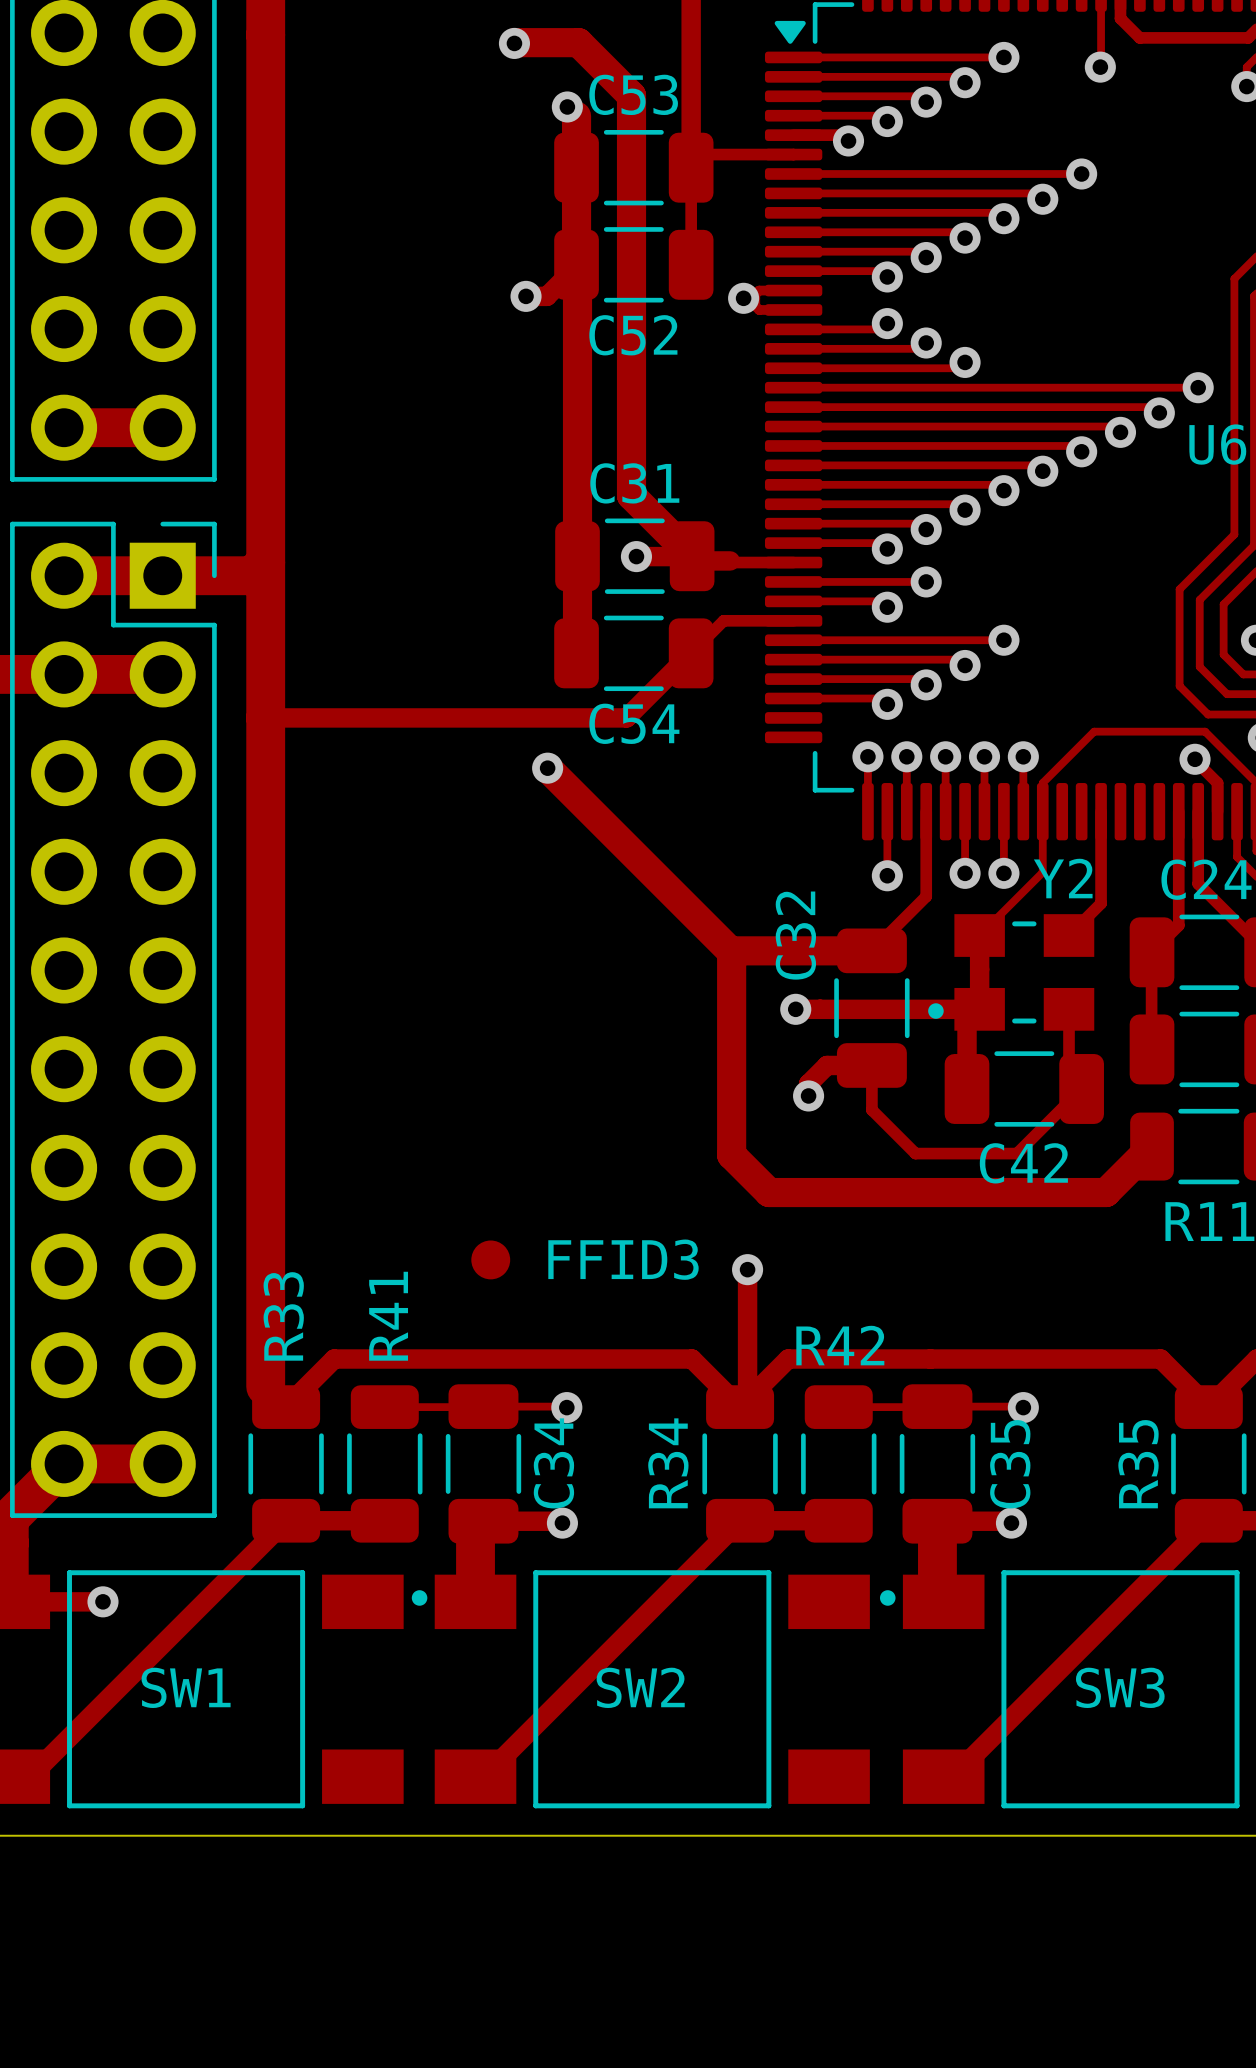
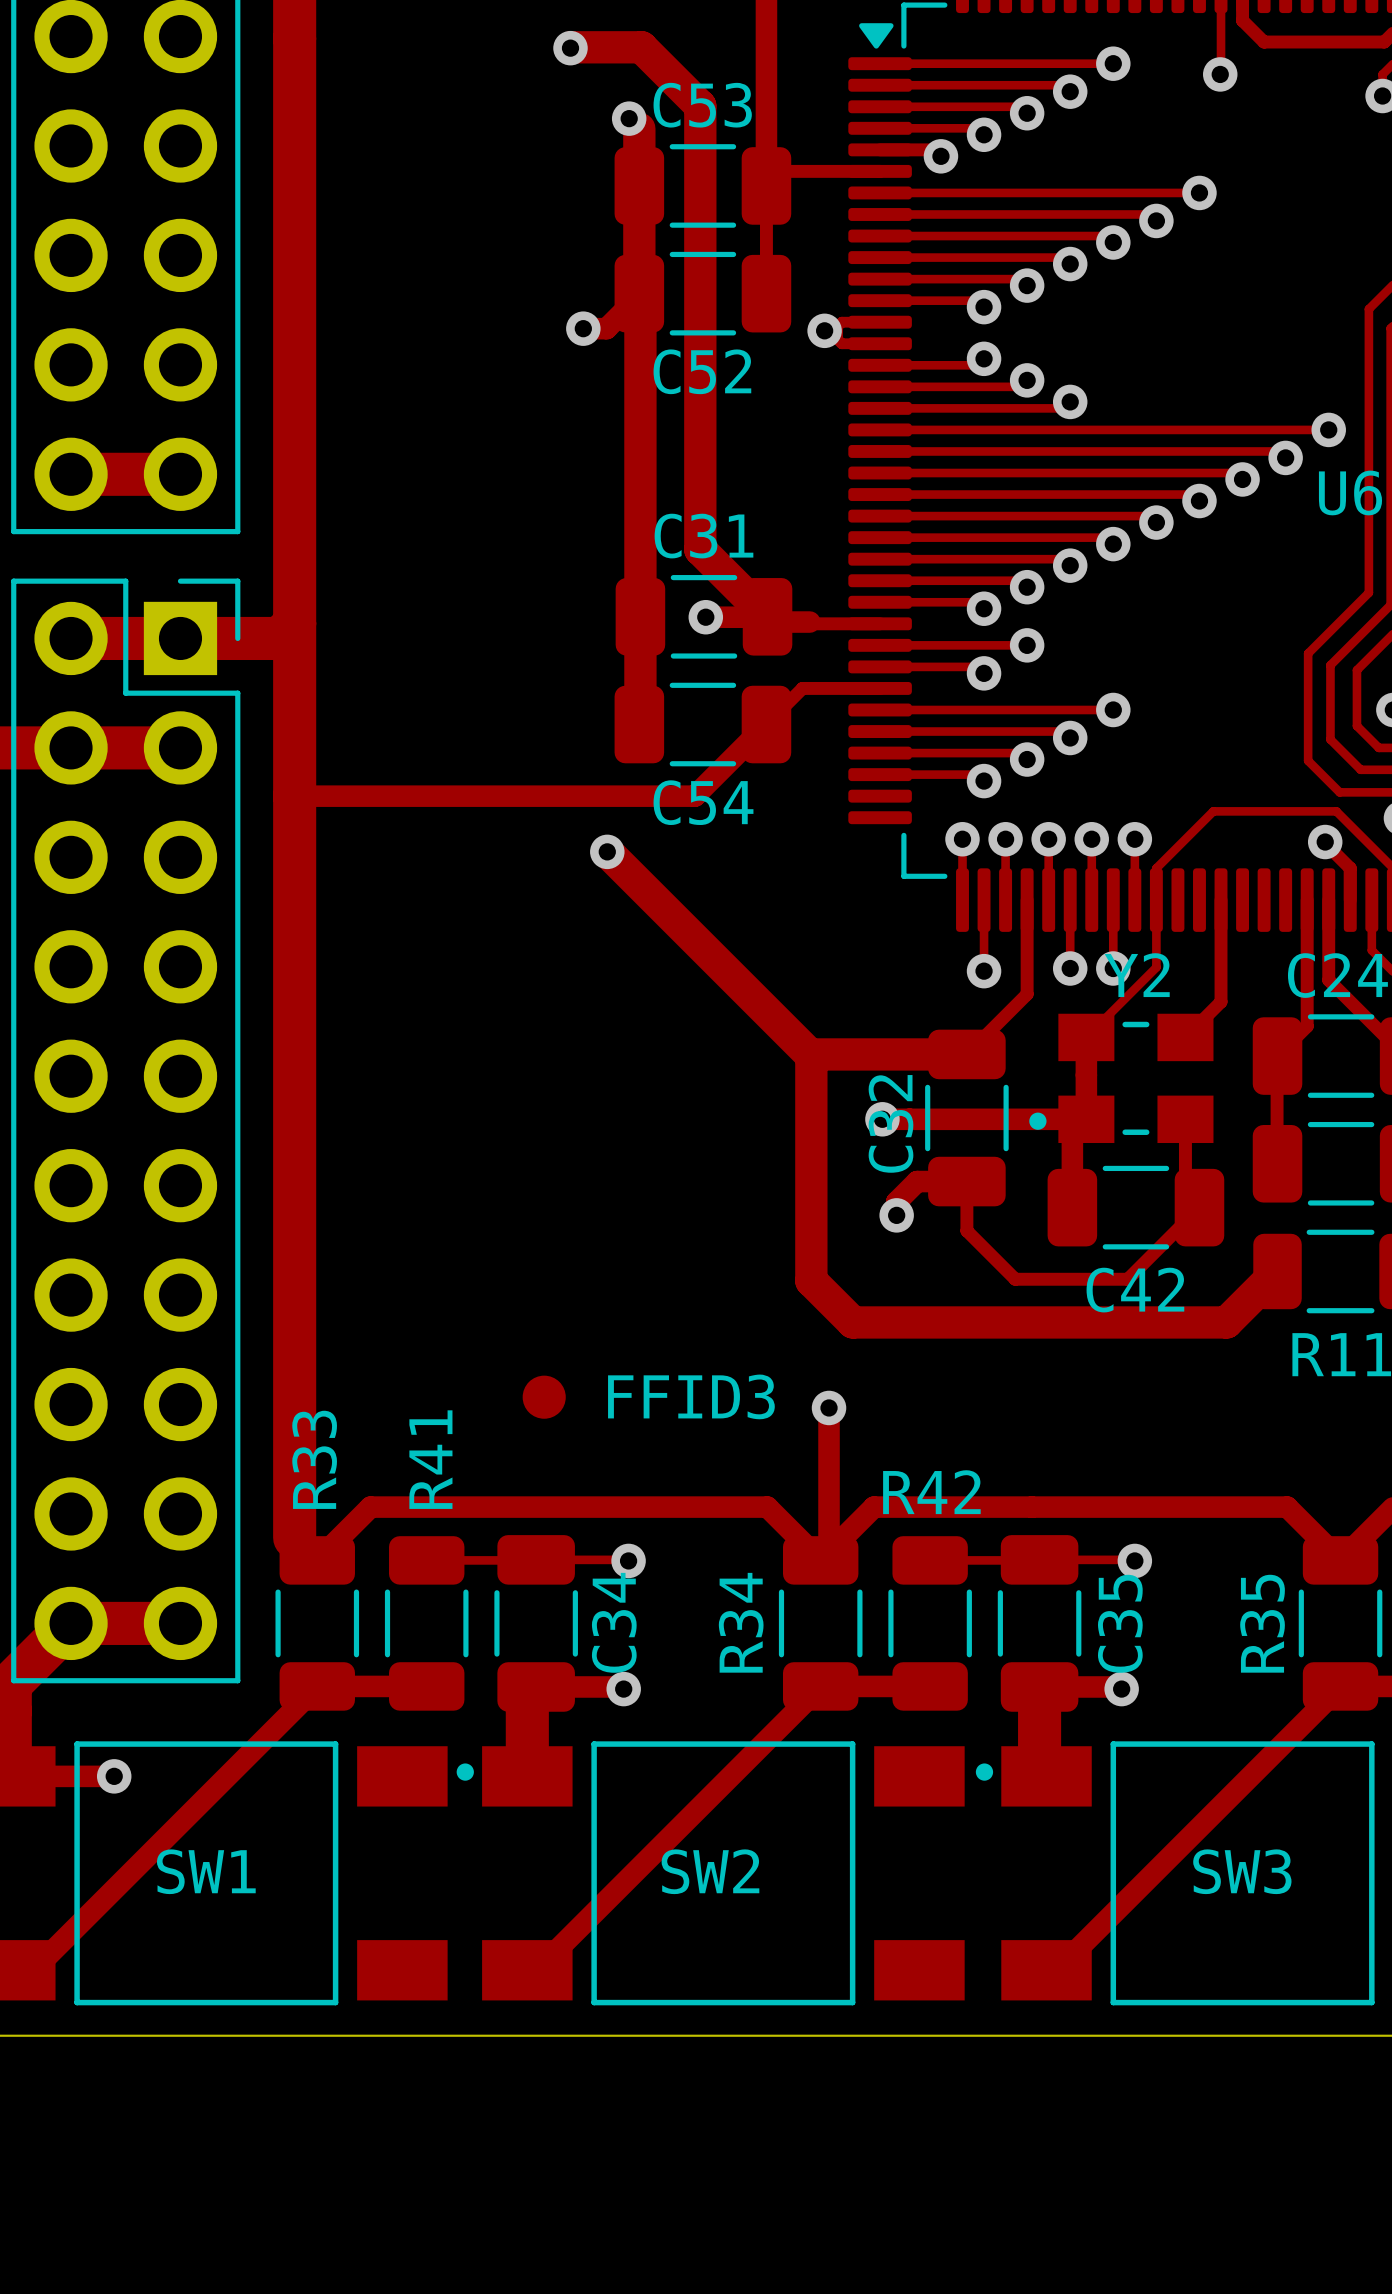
Y2 name position: Y2 (1063, 878) -> Y2 (1137, 975)
C32 name position: C32 (795, 935) -> C32 (890, 1123)

